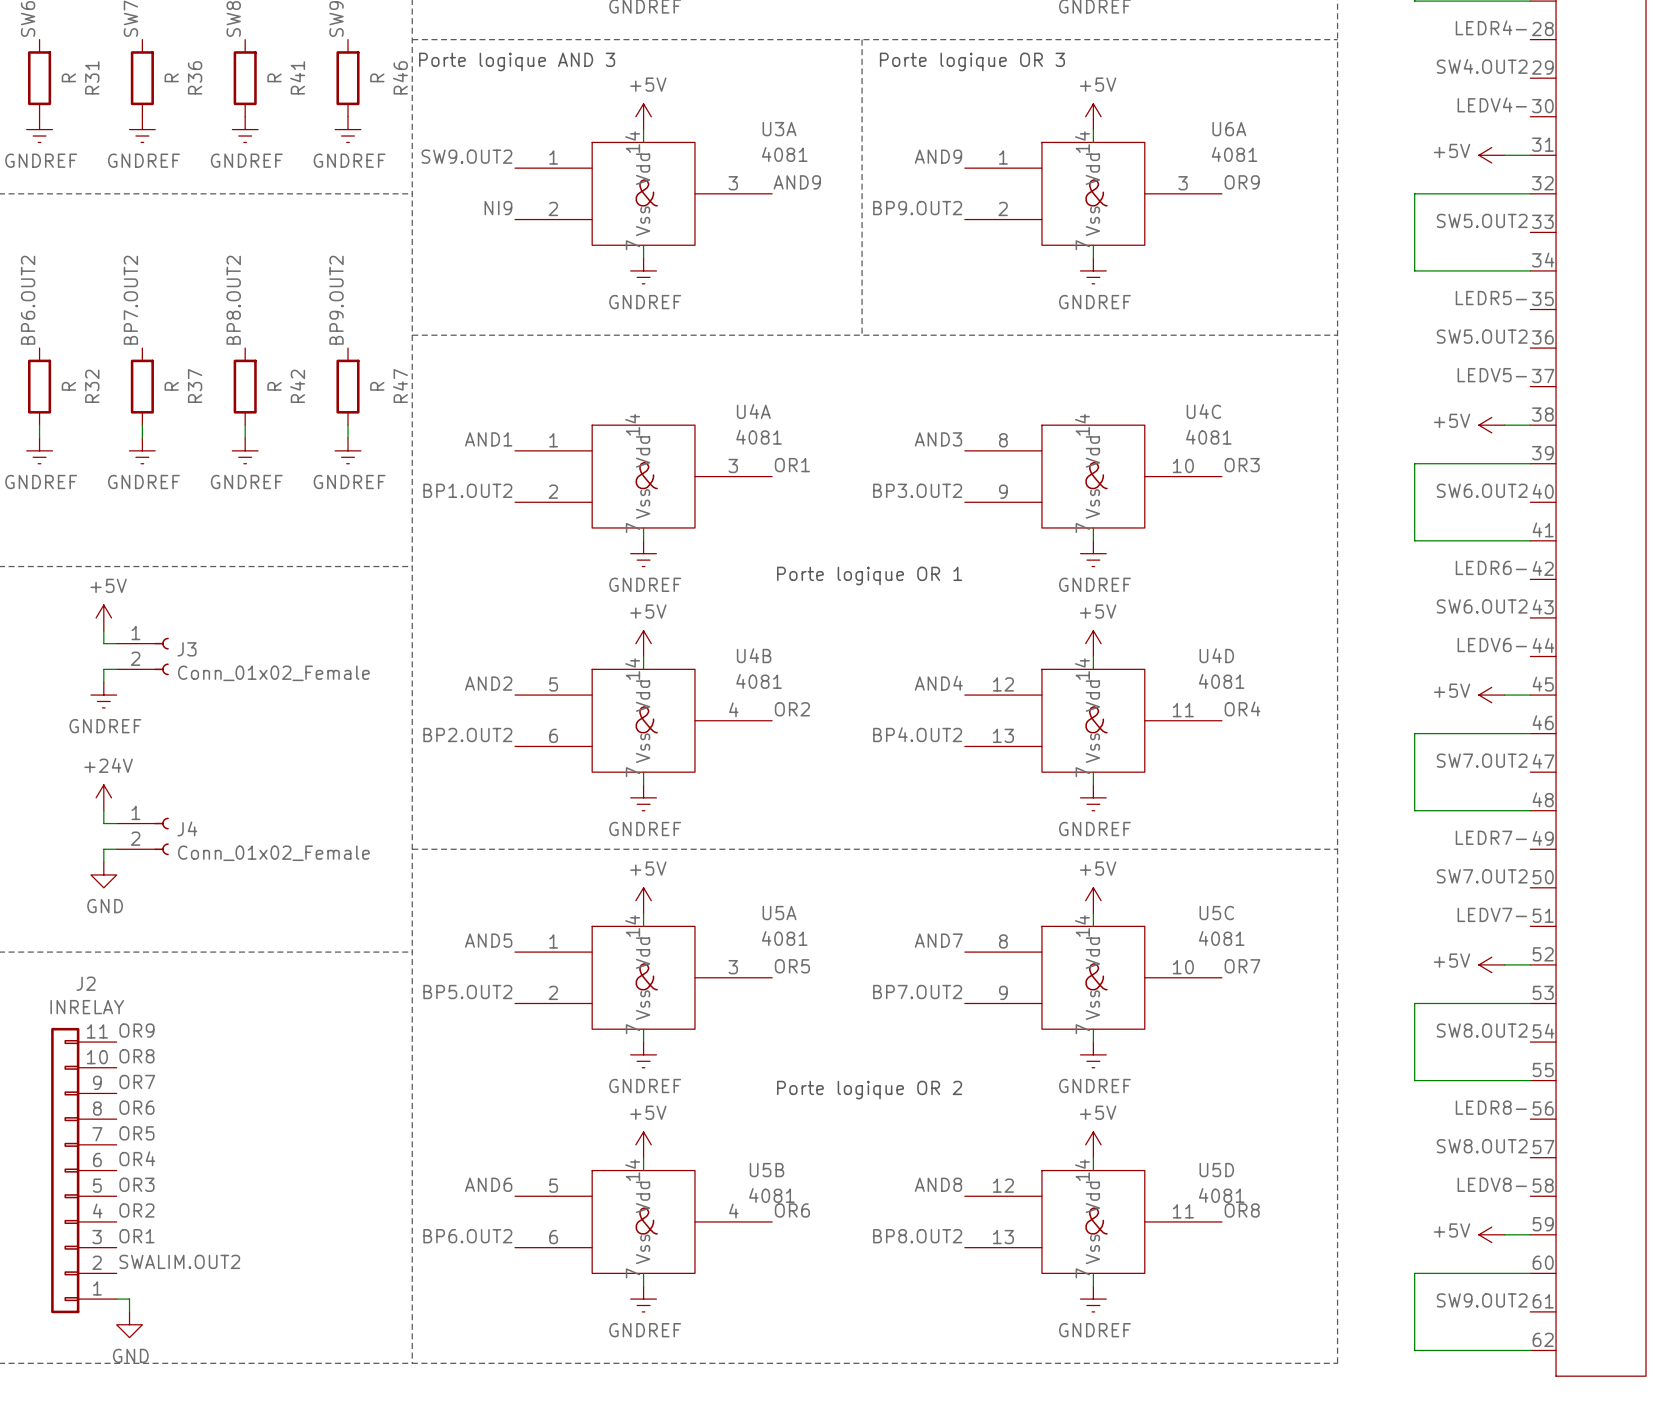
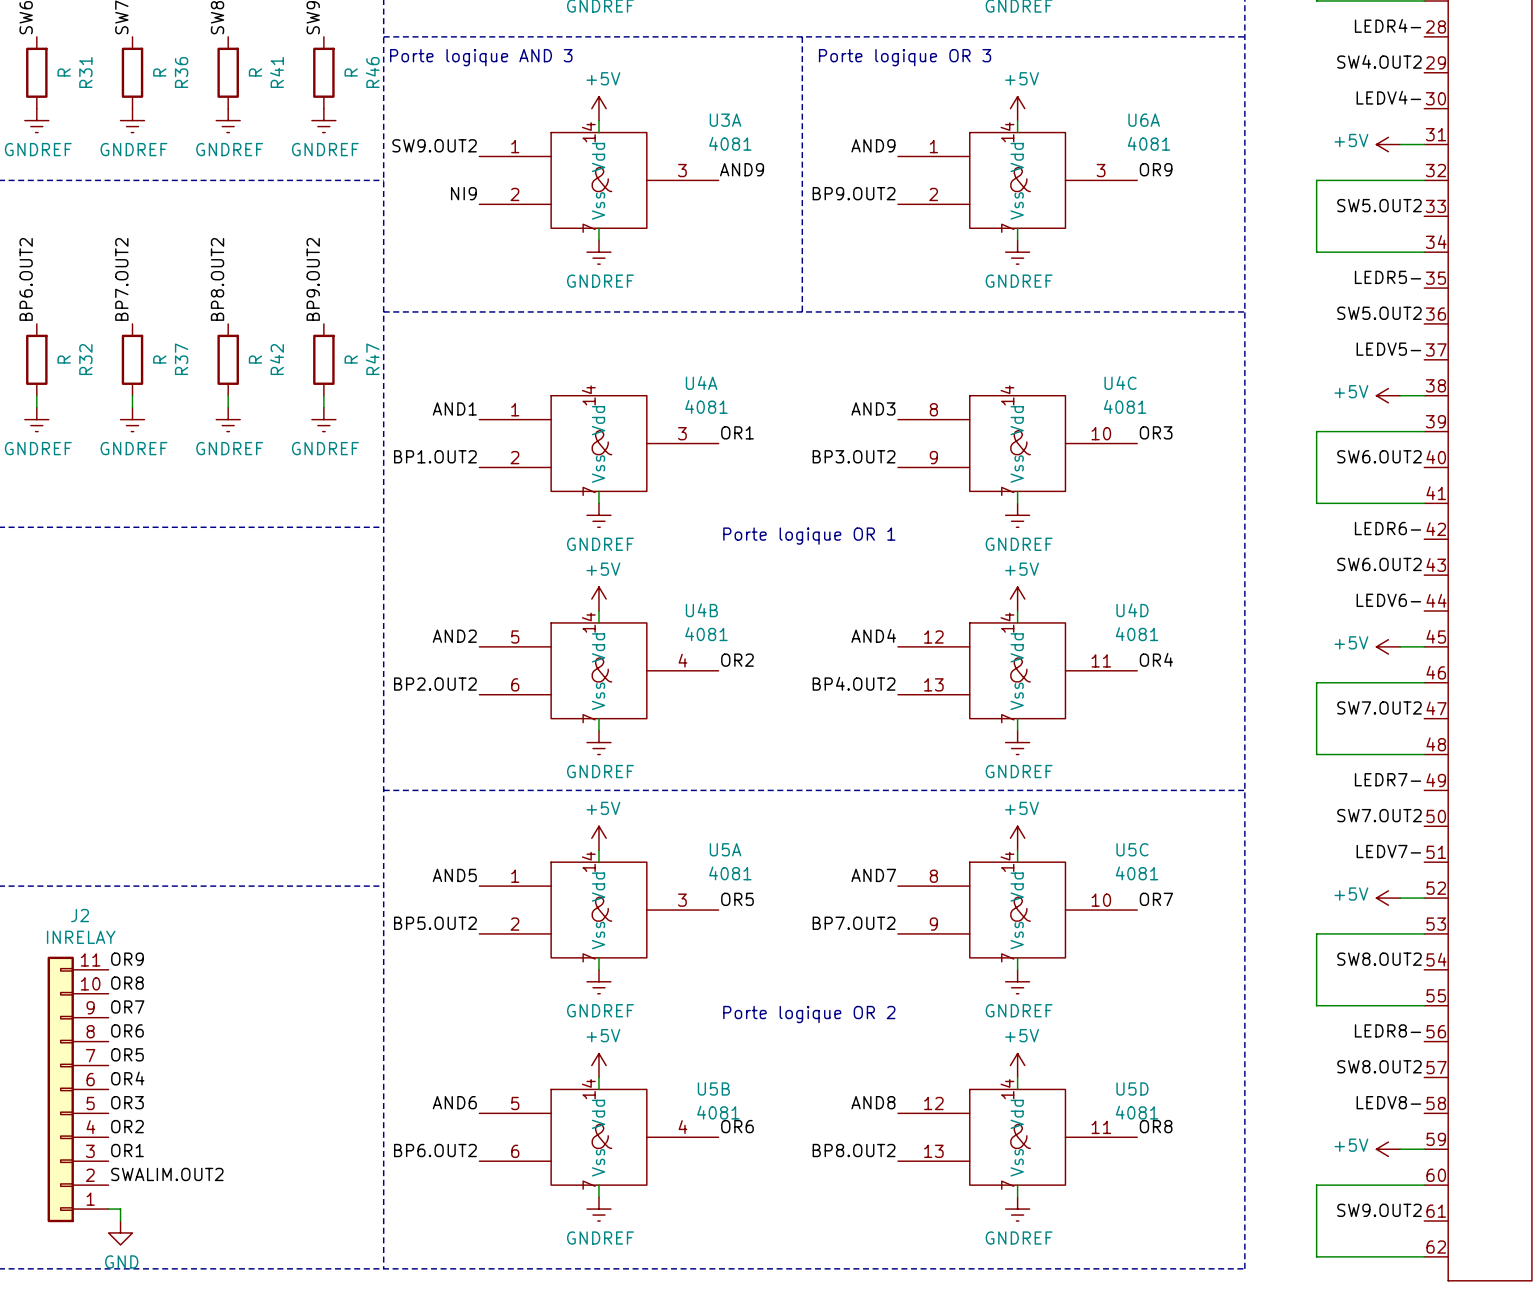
power symbol: +5V (103, 617) -> none
wire: (103, 630) (103, 643) (116, 643) -> none
J3: Conn_01x02_Female (142, 656) -> none
wire: (116, 669) (103, 669) (103, 682) -> none
power symbol: GNDREF (103, 695) -> none
power symbol: +24V (103, 797) -> none
wire: (103, 810) (103, 823) (116, 823) -> none
J4: Conn_01x02_Female (142, 836) -> none
wire: (116, 849) (103, 849) (103, 862) -> none
power symbol: GND (103, 874) -> none

